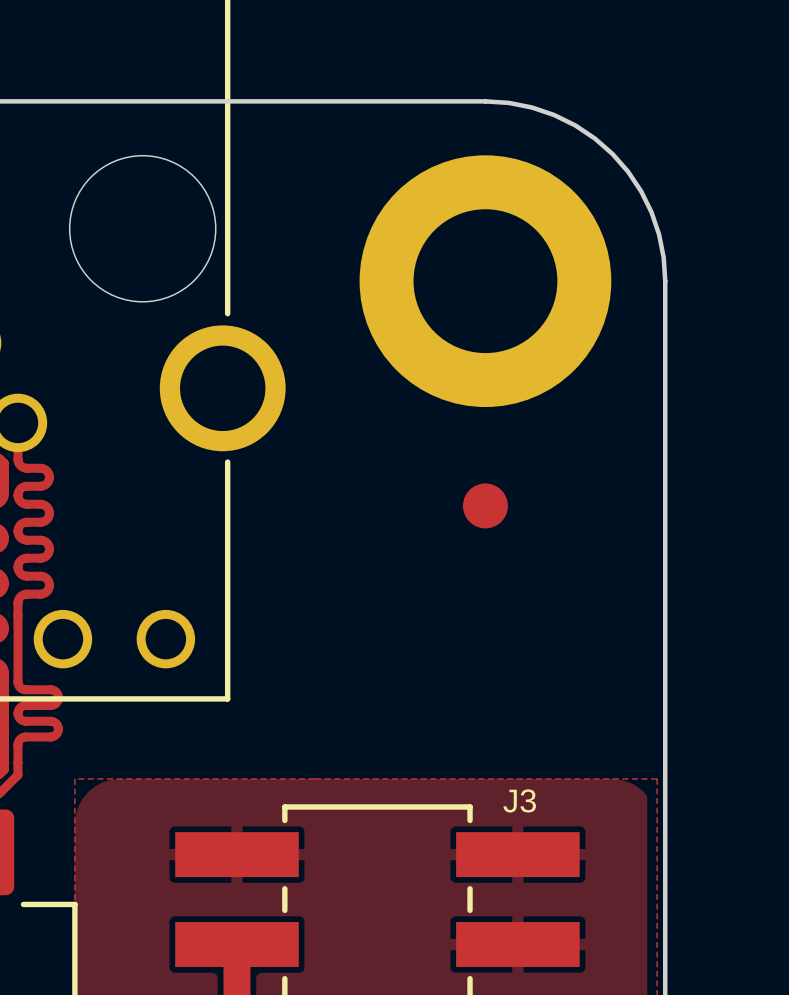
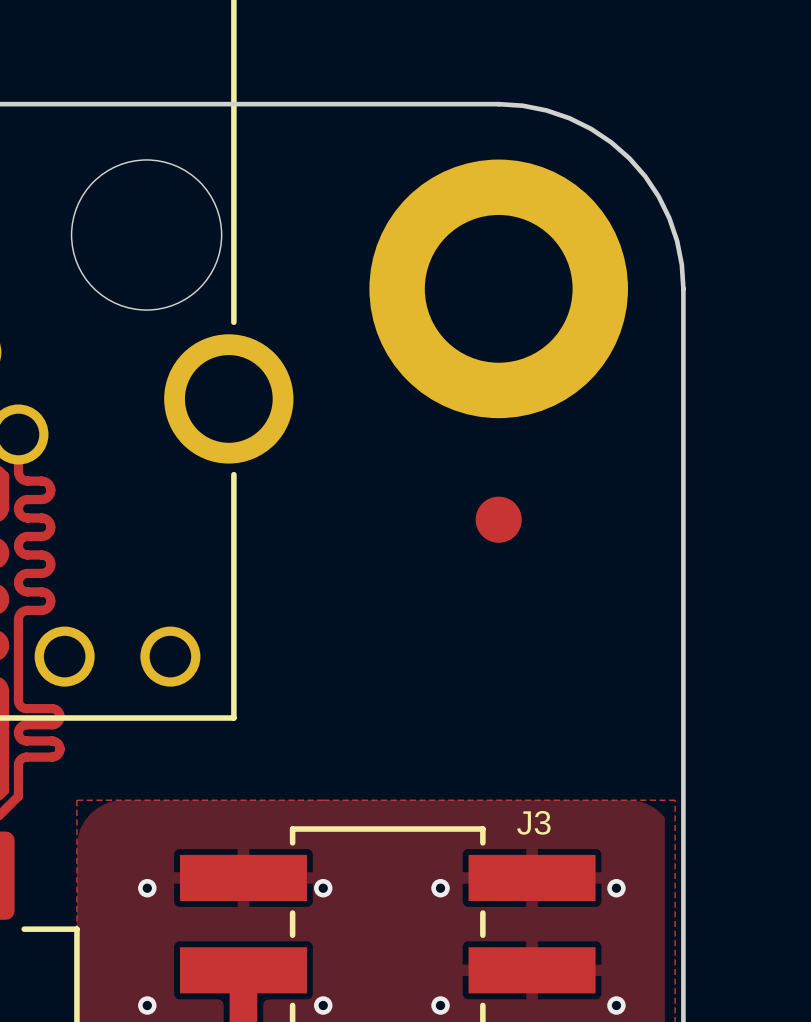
via: none -> (147, 888)
via: none -> (323, 888)
via: none -> (440, 888)
via: none -> (616, 888)
via: none -> (147, 1005)
via: none -> (323, 1005)
via: none -> (440, 1005)
via: none -> (616, 1005)

